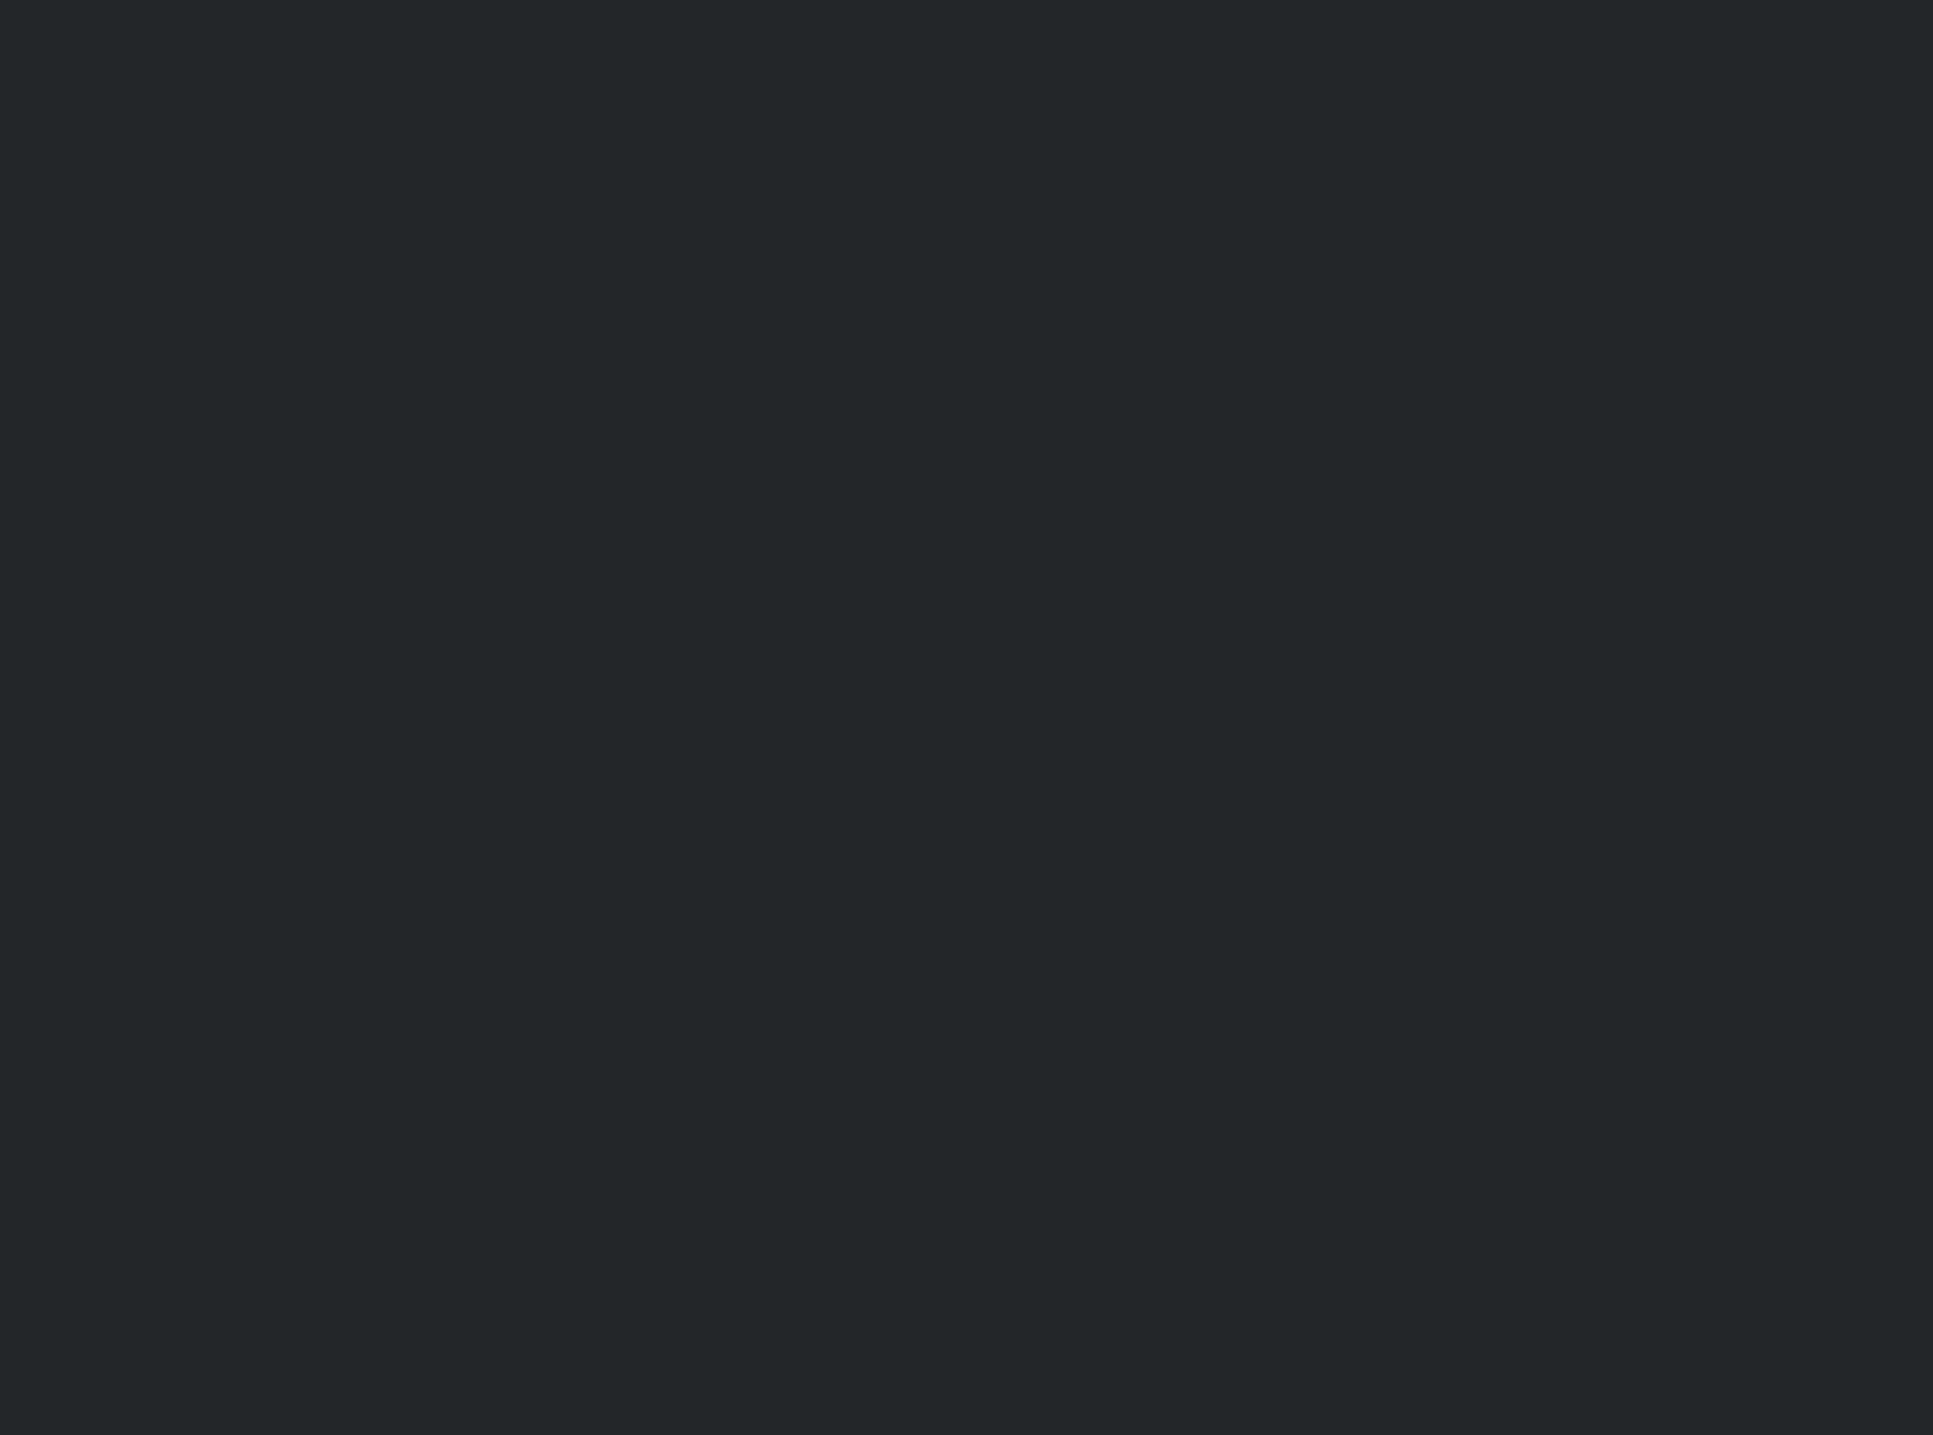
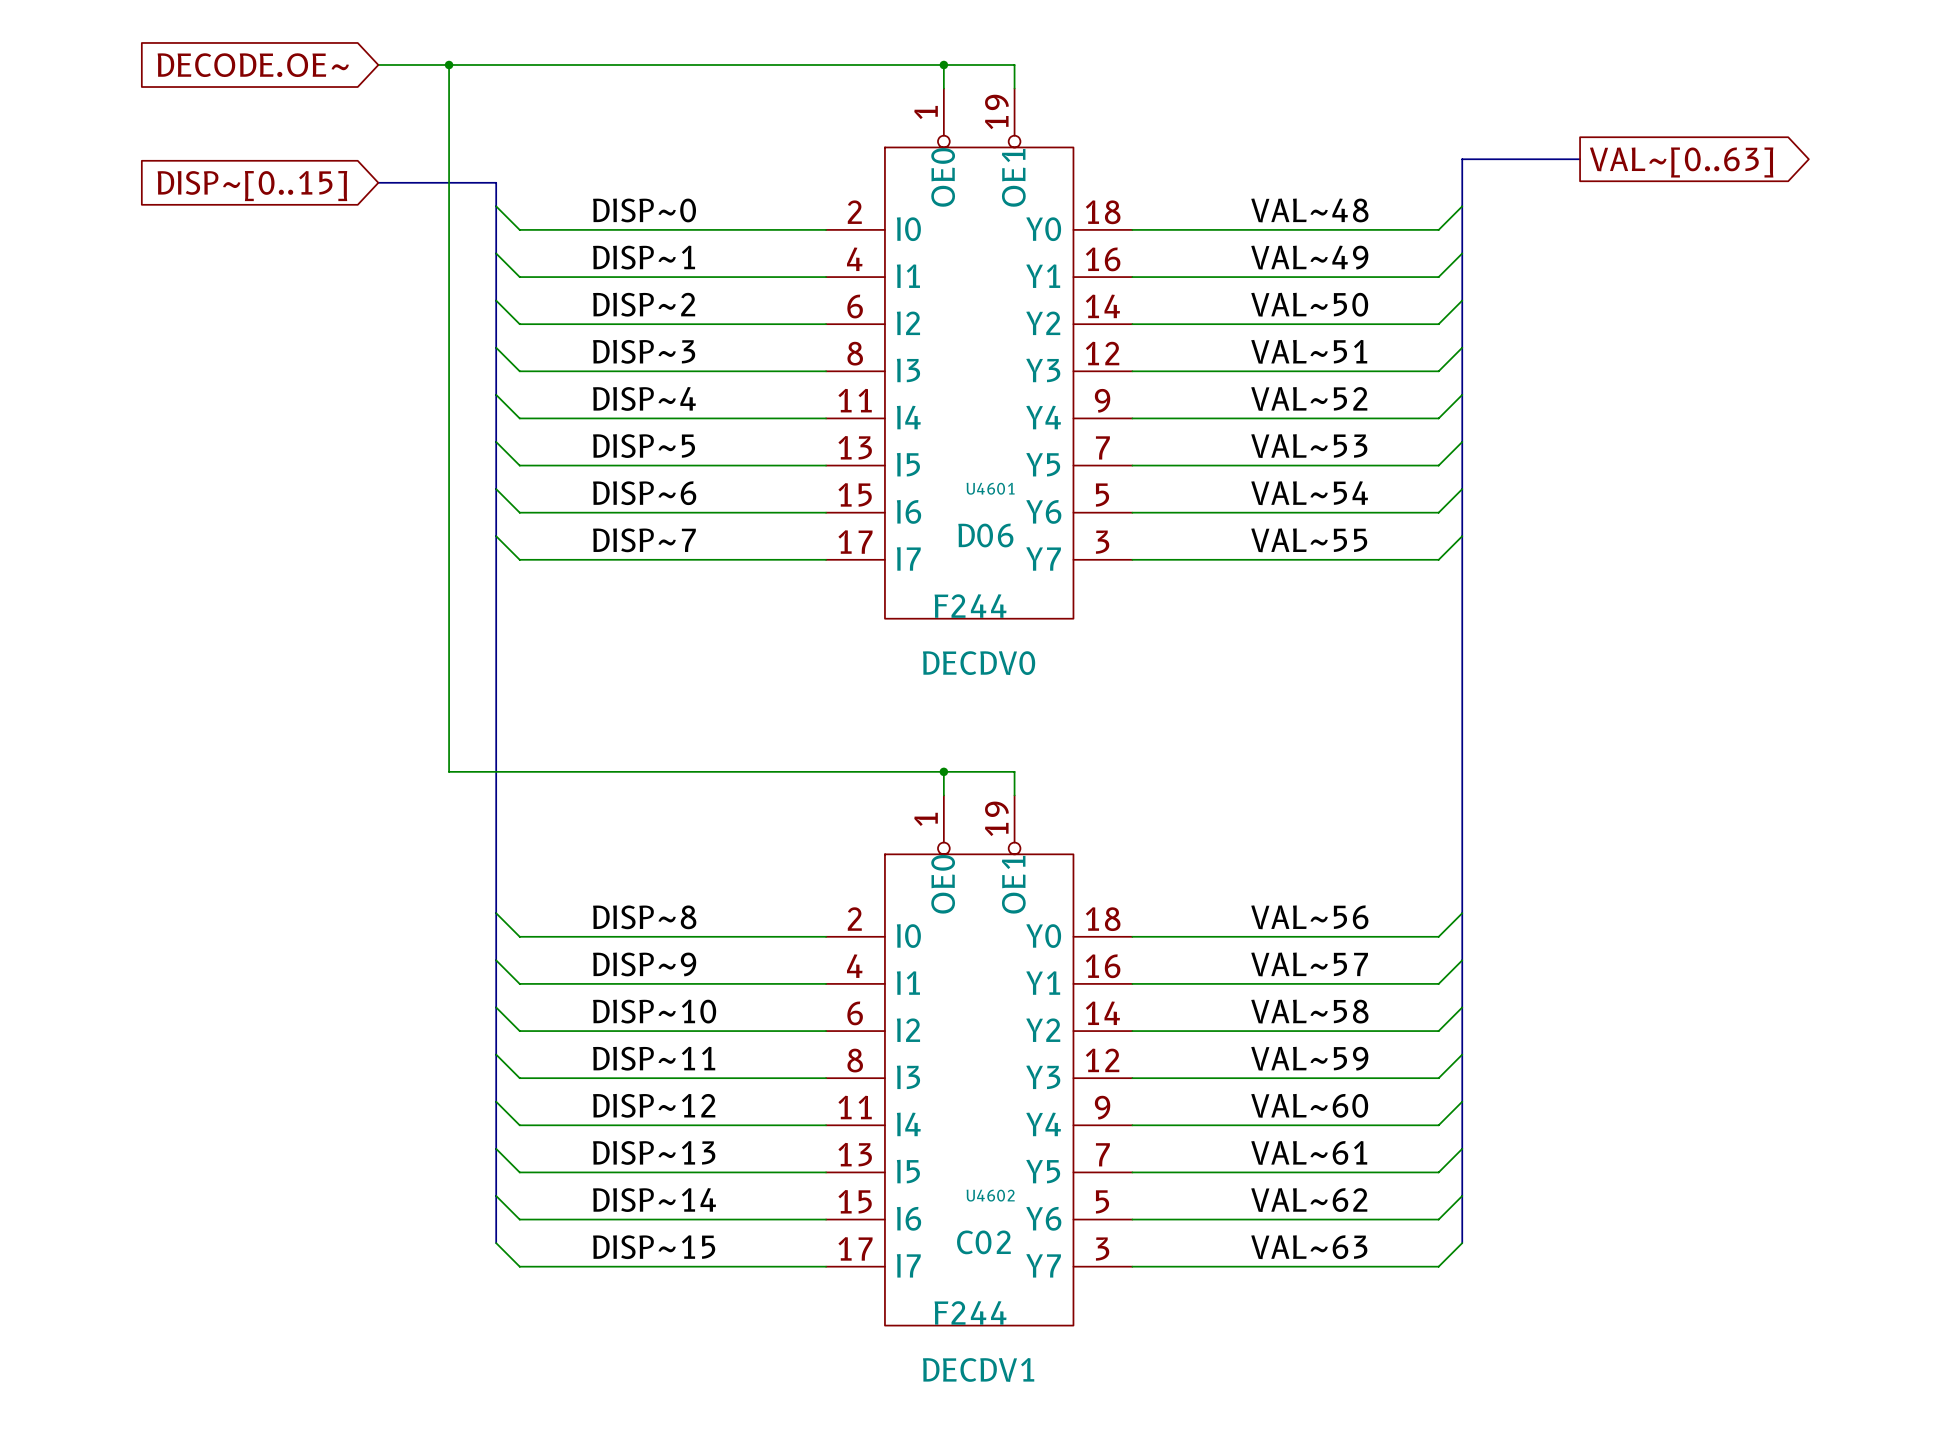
global label: none -> DECODE.OE~ (253, 65)
wire: none -> (378, 64) (1014, 64) (1014, 88)
wire: none -> (449, 64) (449, 771) (1014, 771) (1014, 795)
junction: none -> (449, 64)
wire: none -> (943, 64) (943, 88)
junction: none -> (943, 64)
bus: none -> (1580, 159) (1462, 159) (1462, 1243)
global label: none -> VAL~[0..63] (1681, 162)
bus: none -> (378, 182) (496, 182) (496, 1243)
global label: none -> DISP~[0..15] (252, 186)
wire: none -> (496, 206) (519, 229) (826, 229)
wire: none -> (1462, 206) (1438, 229) (1132, 229)
label: none -> VAL~48 (1309, 210)
label: none -> DISP~0 (644, 210)
wire: none -> (496, 253) (519, 277) (826, 277)
wire: none -> (1462, 253) (1438, 277) (1132, 277)
label: none -> VAL~49 (1309, 257)
label: none -> DISP~1 (644, 257)
wire: none -> (496, 300) (519, 324) (826, 324)
wire: none -> (1462, 300) (1438, 324) (1132, 324)
label: none -> DISP~2 (644, 304)
label: none -> VAL~50 (1309, 304)
wire: none -> (496, 347) (519, 371) (826, 371)
wire: none -> (1462, 347) (1438, 371) (1132, 371)
label: none -> DISP~3 (644, 351)
label: none -> VAL~51 (1309, 351)
U4601: none -> F244 (979, 353)
wire: none -> (496, 394) (519, 418) (826, 418)
wire: none -> (1462, 394) (1438, 418) (1132, 418)
label: none -> DISP~4 (644, 398)
label: none -> VAL~52 (1309, 398)
wire: none -> (496, 441) (519, 465) (826, 465)
wire: none -> (1462, 441) (1438, 465) (1132, 465)
label: none -> DISP~5 (644, 446)
label: none -> VAL~53 (1309, 446)
wire: none -> (496, 489) (519, 512) (826, 512)
wire: none -> (1462, 489) (1438, 512) (1132, 512)
label: none -> VAL~54 (1309, 493)
label: none -> DISP~6 (644, 493)
wire: none -> (496, 536) (519, 559) (826, 559)
wire: none -> (1462, 536) (1438, 559) (1132, 559)
label: none -> DISP~7 (644, 540)
label: none -> VAL~55 (1309, 540)
wire: none -> (943, 771) (943, 795)
junction: none -> (943, 771)
wire: none -> (496, 913) (519, 936) (826, 936)
wire: none -> (1462, 913) (1438, 936) (1132, 936)
label: none -> DISP~8 (644, 917)
label: none -> VAL~56 (1309, 917)
wire: none -> (496, 960) (519, 983) (826, 983)
wire: none -> (1462, 960) (1438, 983) (1132, 983)
label: none -> DISP~9 (644, 964)
label: none -> VAL~57 (1309, 964)
wire: none -> (496, 1007) (519, 1031) (826, 1031)
wire: none -> (1462, 1007) (1438, 1031) (1132, 1031)
label: none -> DISP~10 (654, 1011)
label: none -> VAL~58 (1309, 1011)
wire: none -> (496, 1054) (519, 1078) (826, 1078)
wire: none -> (1462, 1054) (1438, 1078) (1132, 1078)
label: none -> DISP~11 (654, 1058)
label: none -> VAL~59 (1309, 1058)
U4602: none -> F244 (979, 1060)
wire: none -> (496, 1101) (519, 1125) (826, 1125)
wire: none -> (1462, 1101) (1438, 1125) (1132, 1125)
label: none -> DISP~12 (654, 1105)
label: none -> VAL~60 (1309, 1105)
wire: none -> (496, 1148) (519, 1172) (826, 1172)
wire: none -> (1462, 1148) (1438, 1172) (1132, 1172)
label: none -> DISP~13 (654, 1152)
label: none -> VAL~61 (1309, 1152)
wire: none -> (496, 1195) (519, 1219) (826, 1219)
wire: none -> (1462, 1195) (1438, 1219) (1132, 1219)
label: none -> DISP~14 (654, 1200)
label: none -> VAL~62 (1309, 1200)
wire: none -> (496, 1243) (519, 1266) (826, 1266)
wire: none -> (1462, 1243) (1438, 1266) (1132, 1266)
label: none -> DISP~15 (654, 1247)
label: none -> VAL~63 (1309, 1247)

